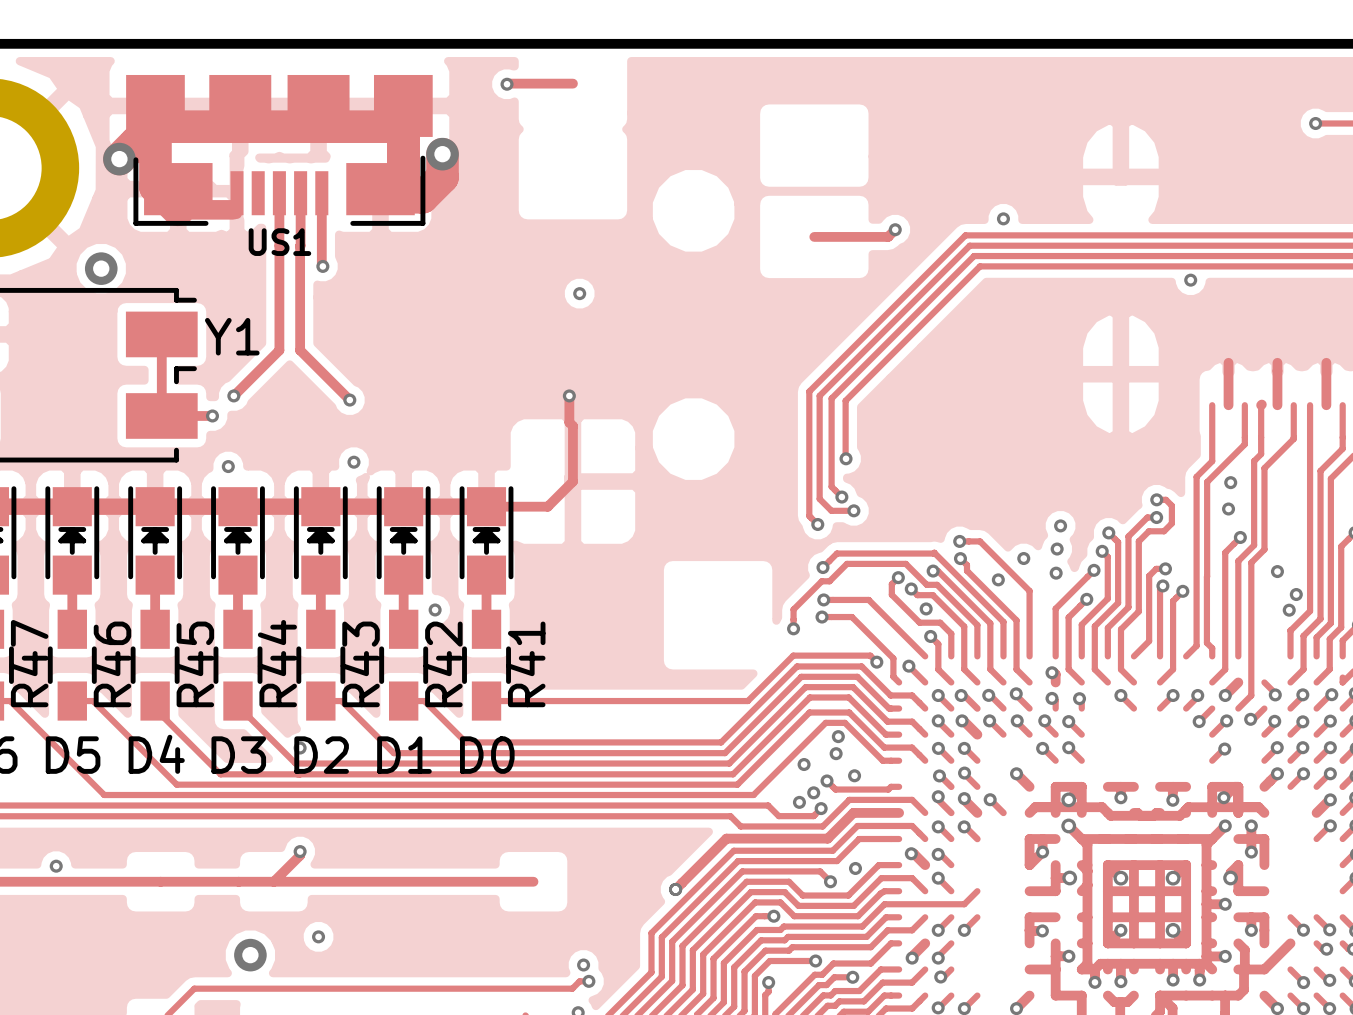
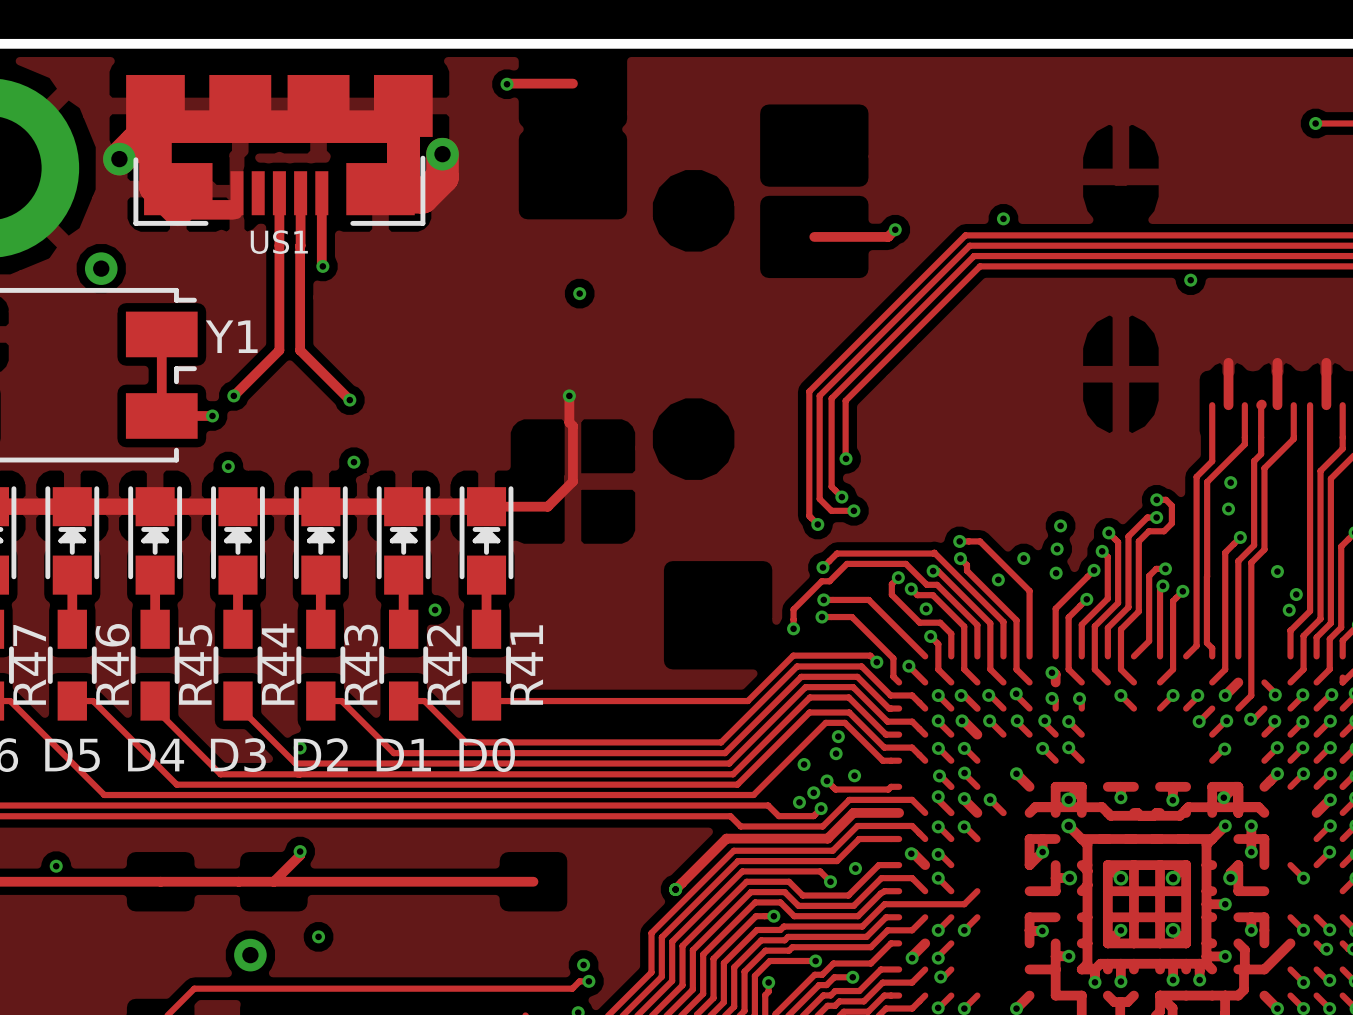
track: none -> (1329, 852) (1316, 865)
via: none -> (1329, 852)
track: none -> (1290, 865) (1303, 878)
via: none -> (1303, 878)

